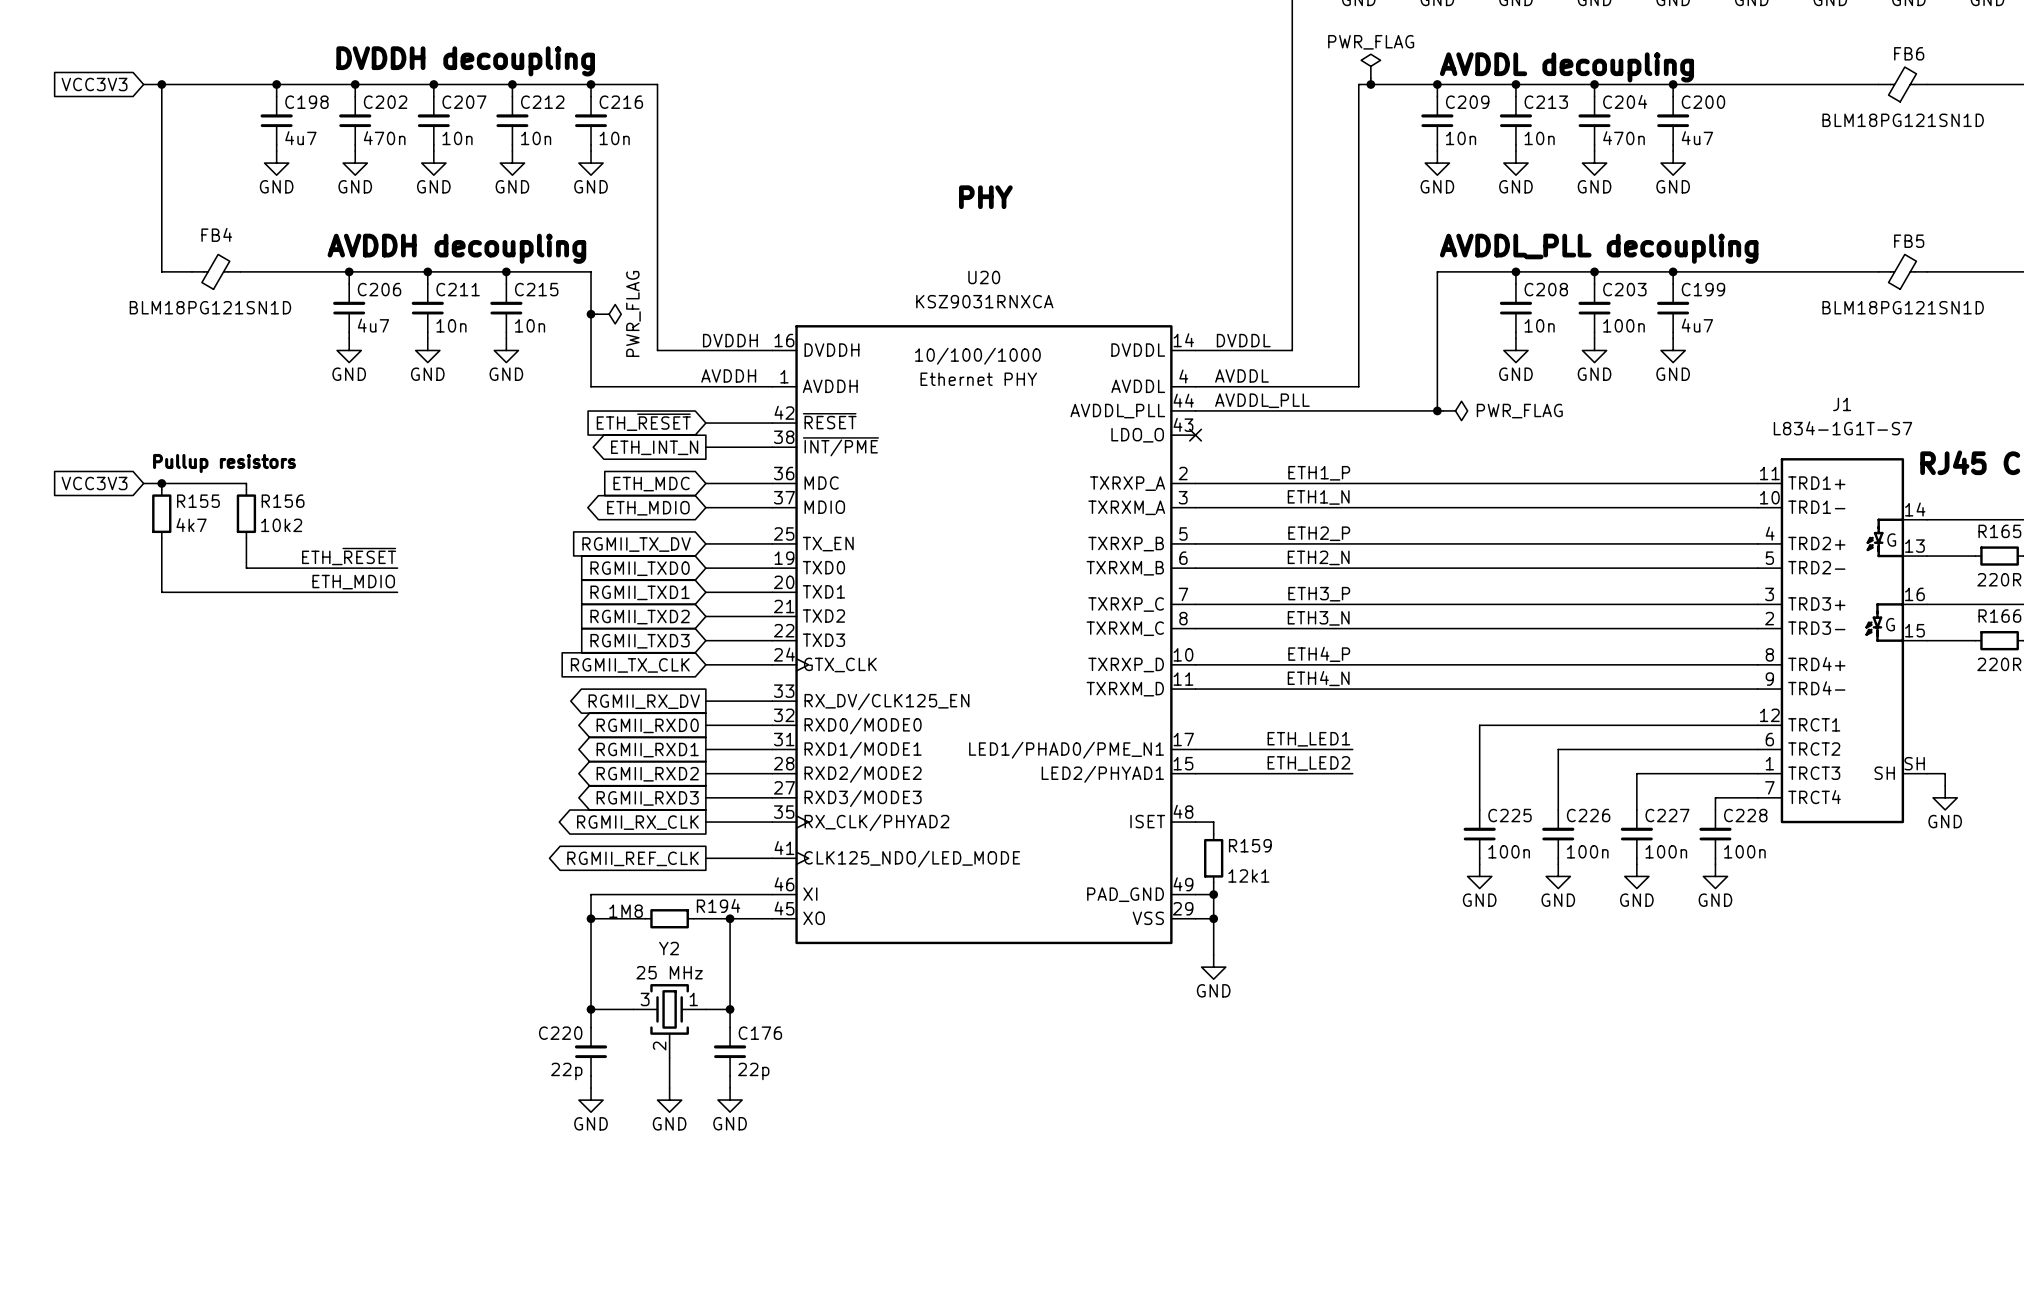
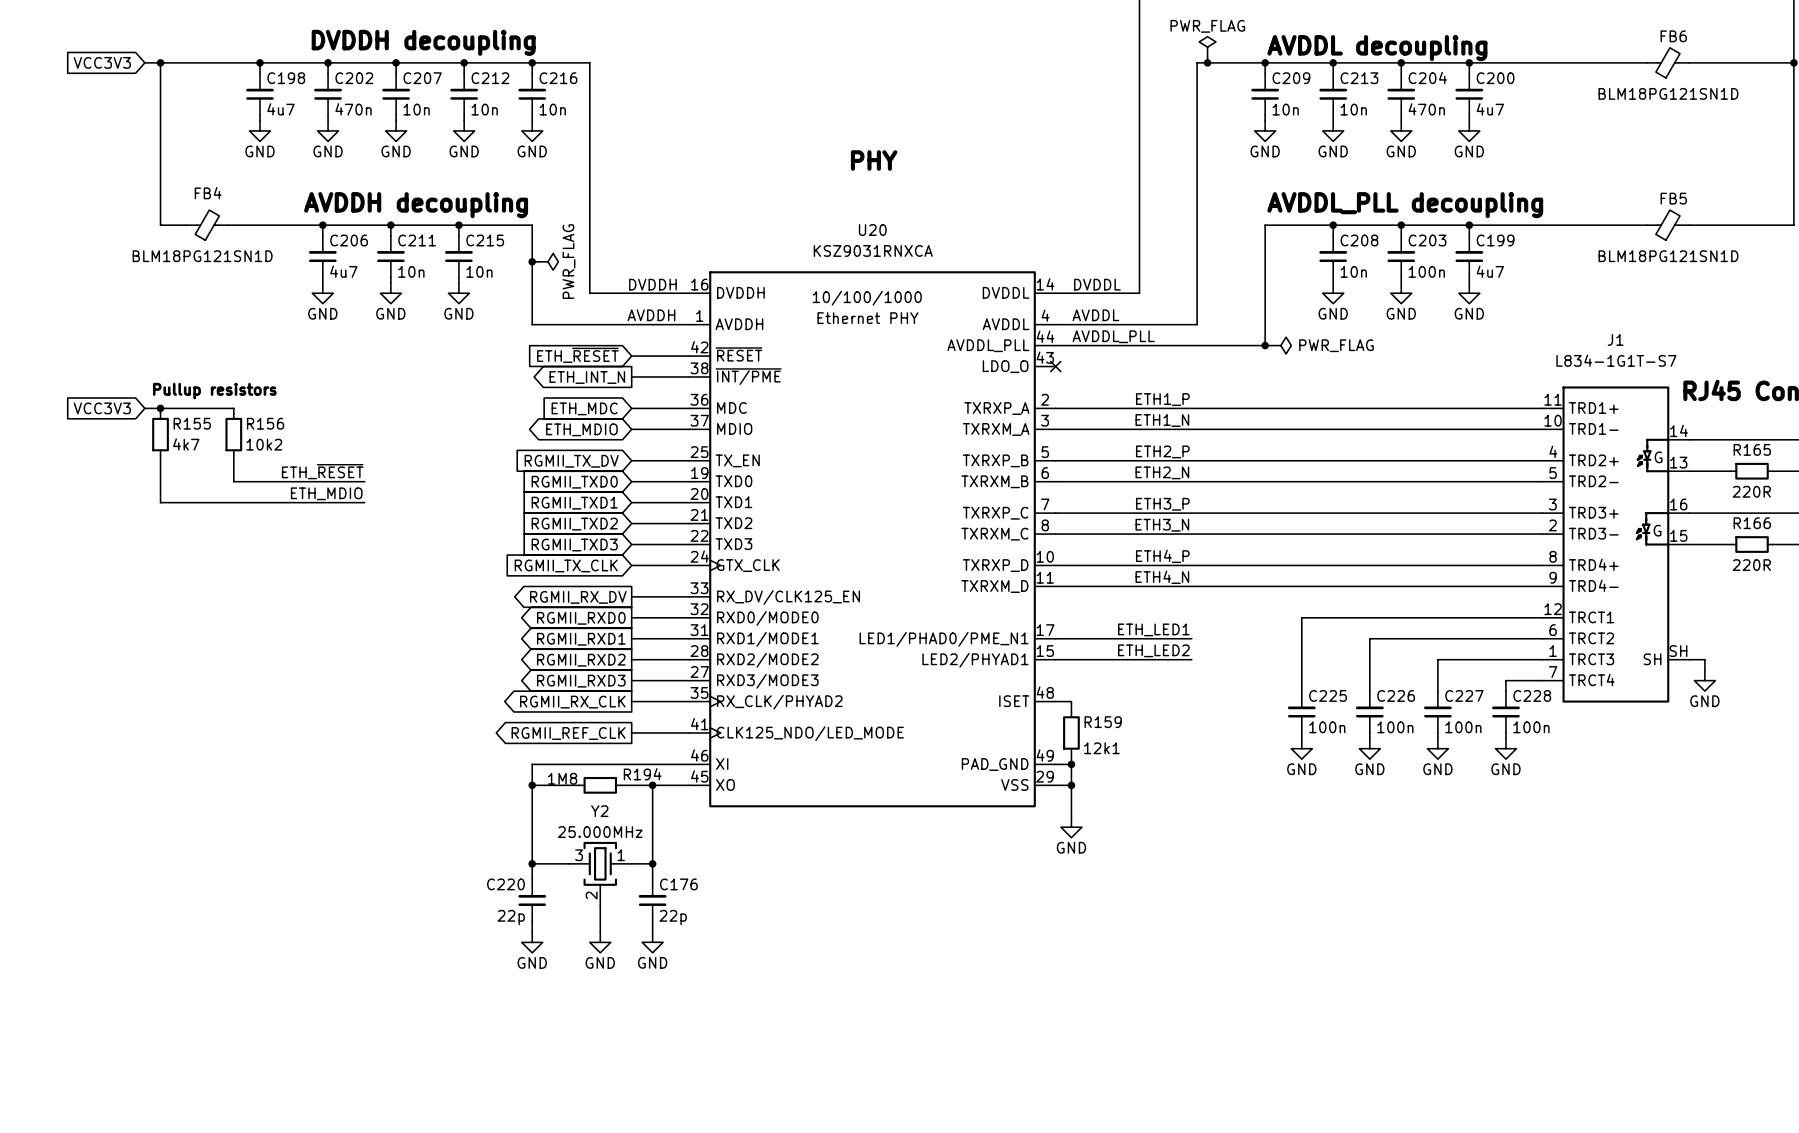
Y2 text: 25 MHz (669, 972) -> 25.000MHz (600, 832)

